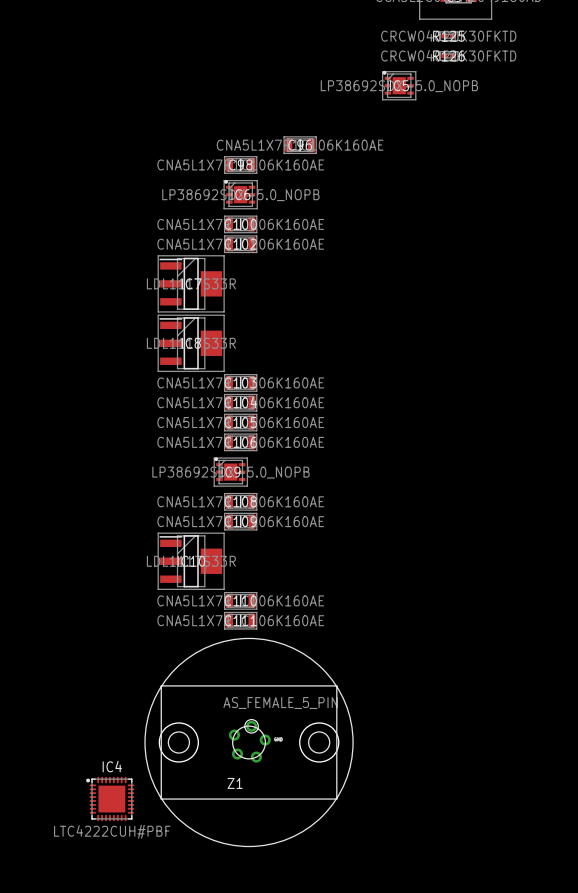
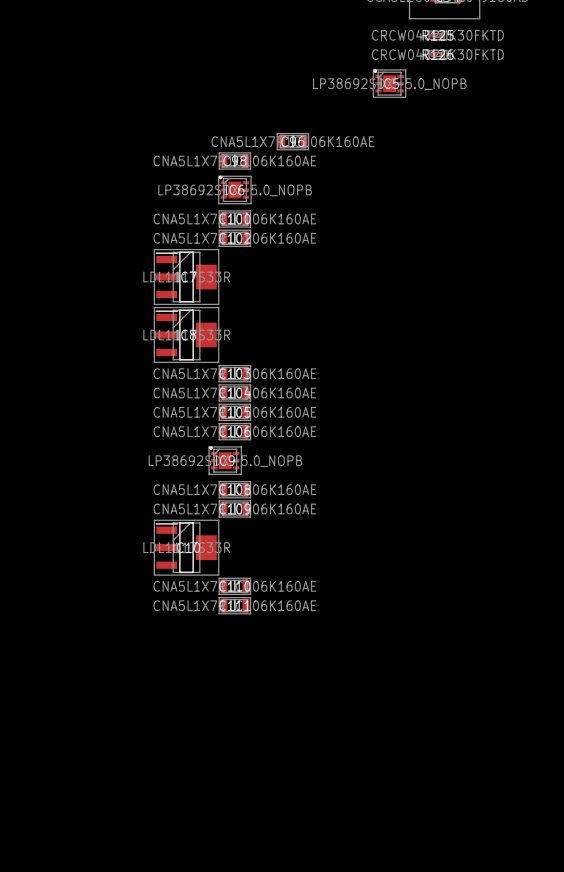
Z1: AS_FEMALE_5_PIN (249, 742) -> none
IC4: LTC4222CUH#PBF (110, 799) -> none

